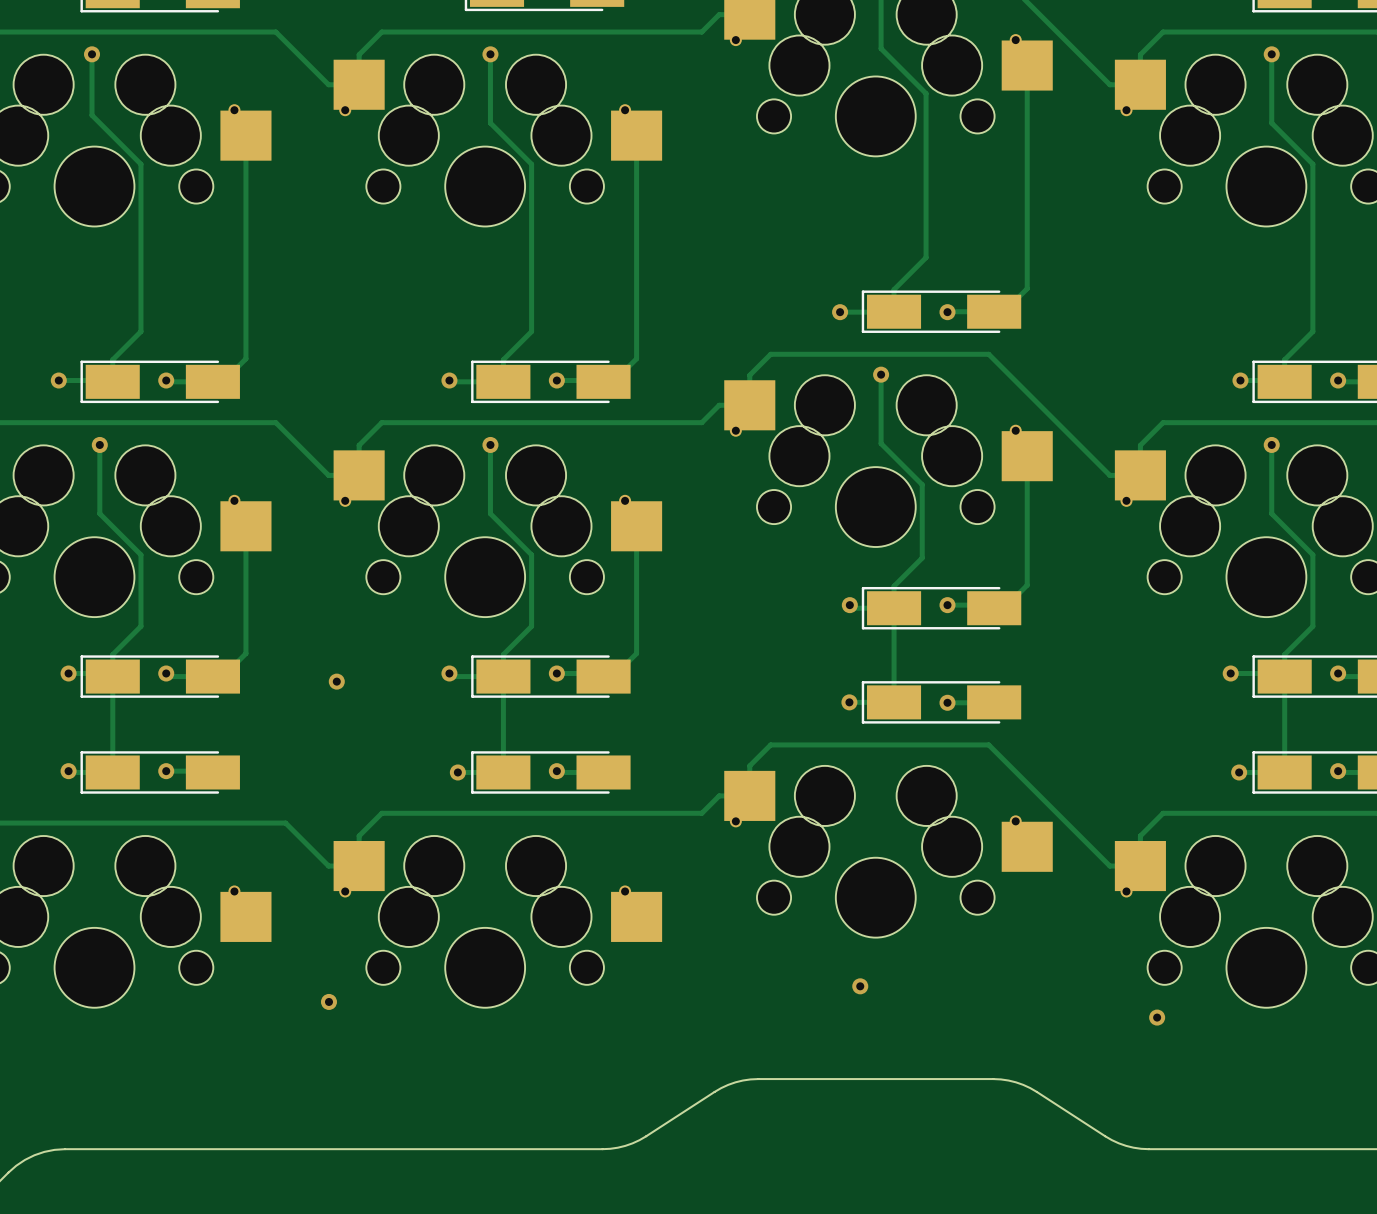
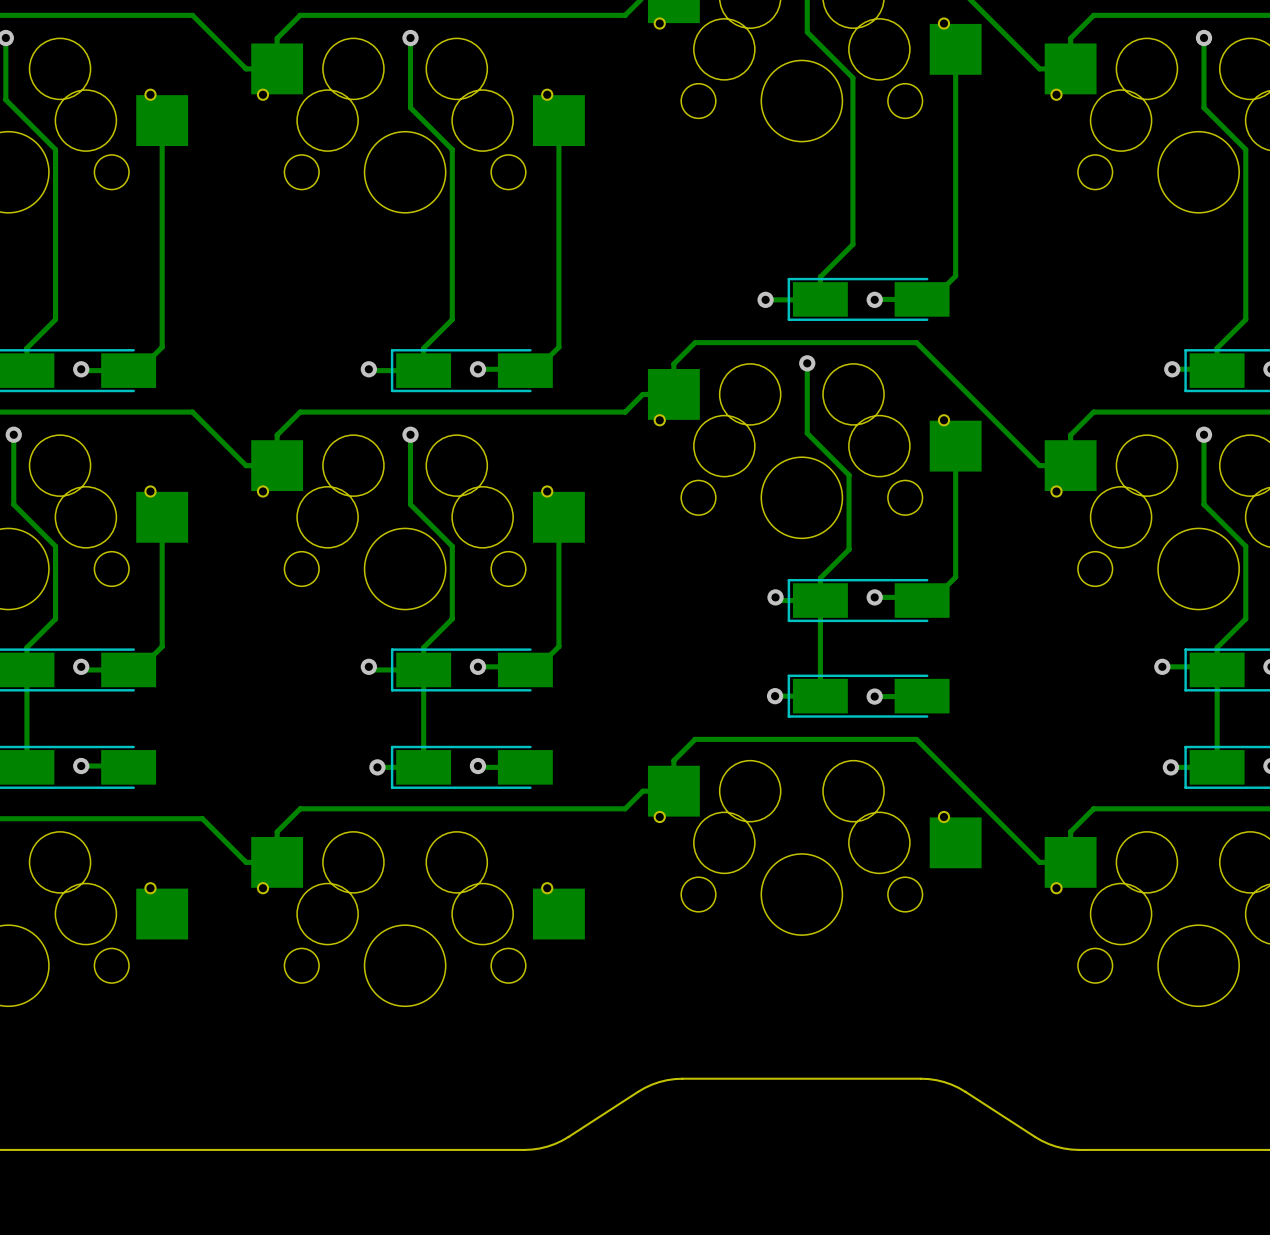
via: (336, 681) -> none
via: (860, 986) -> none
via: (328, 1001) -> none
via: (1157, 1017) -> none

